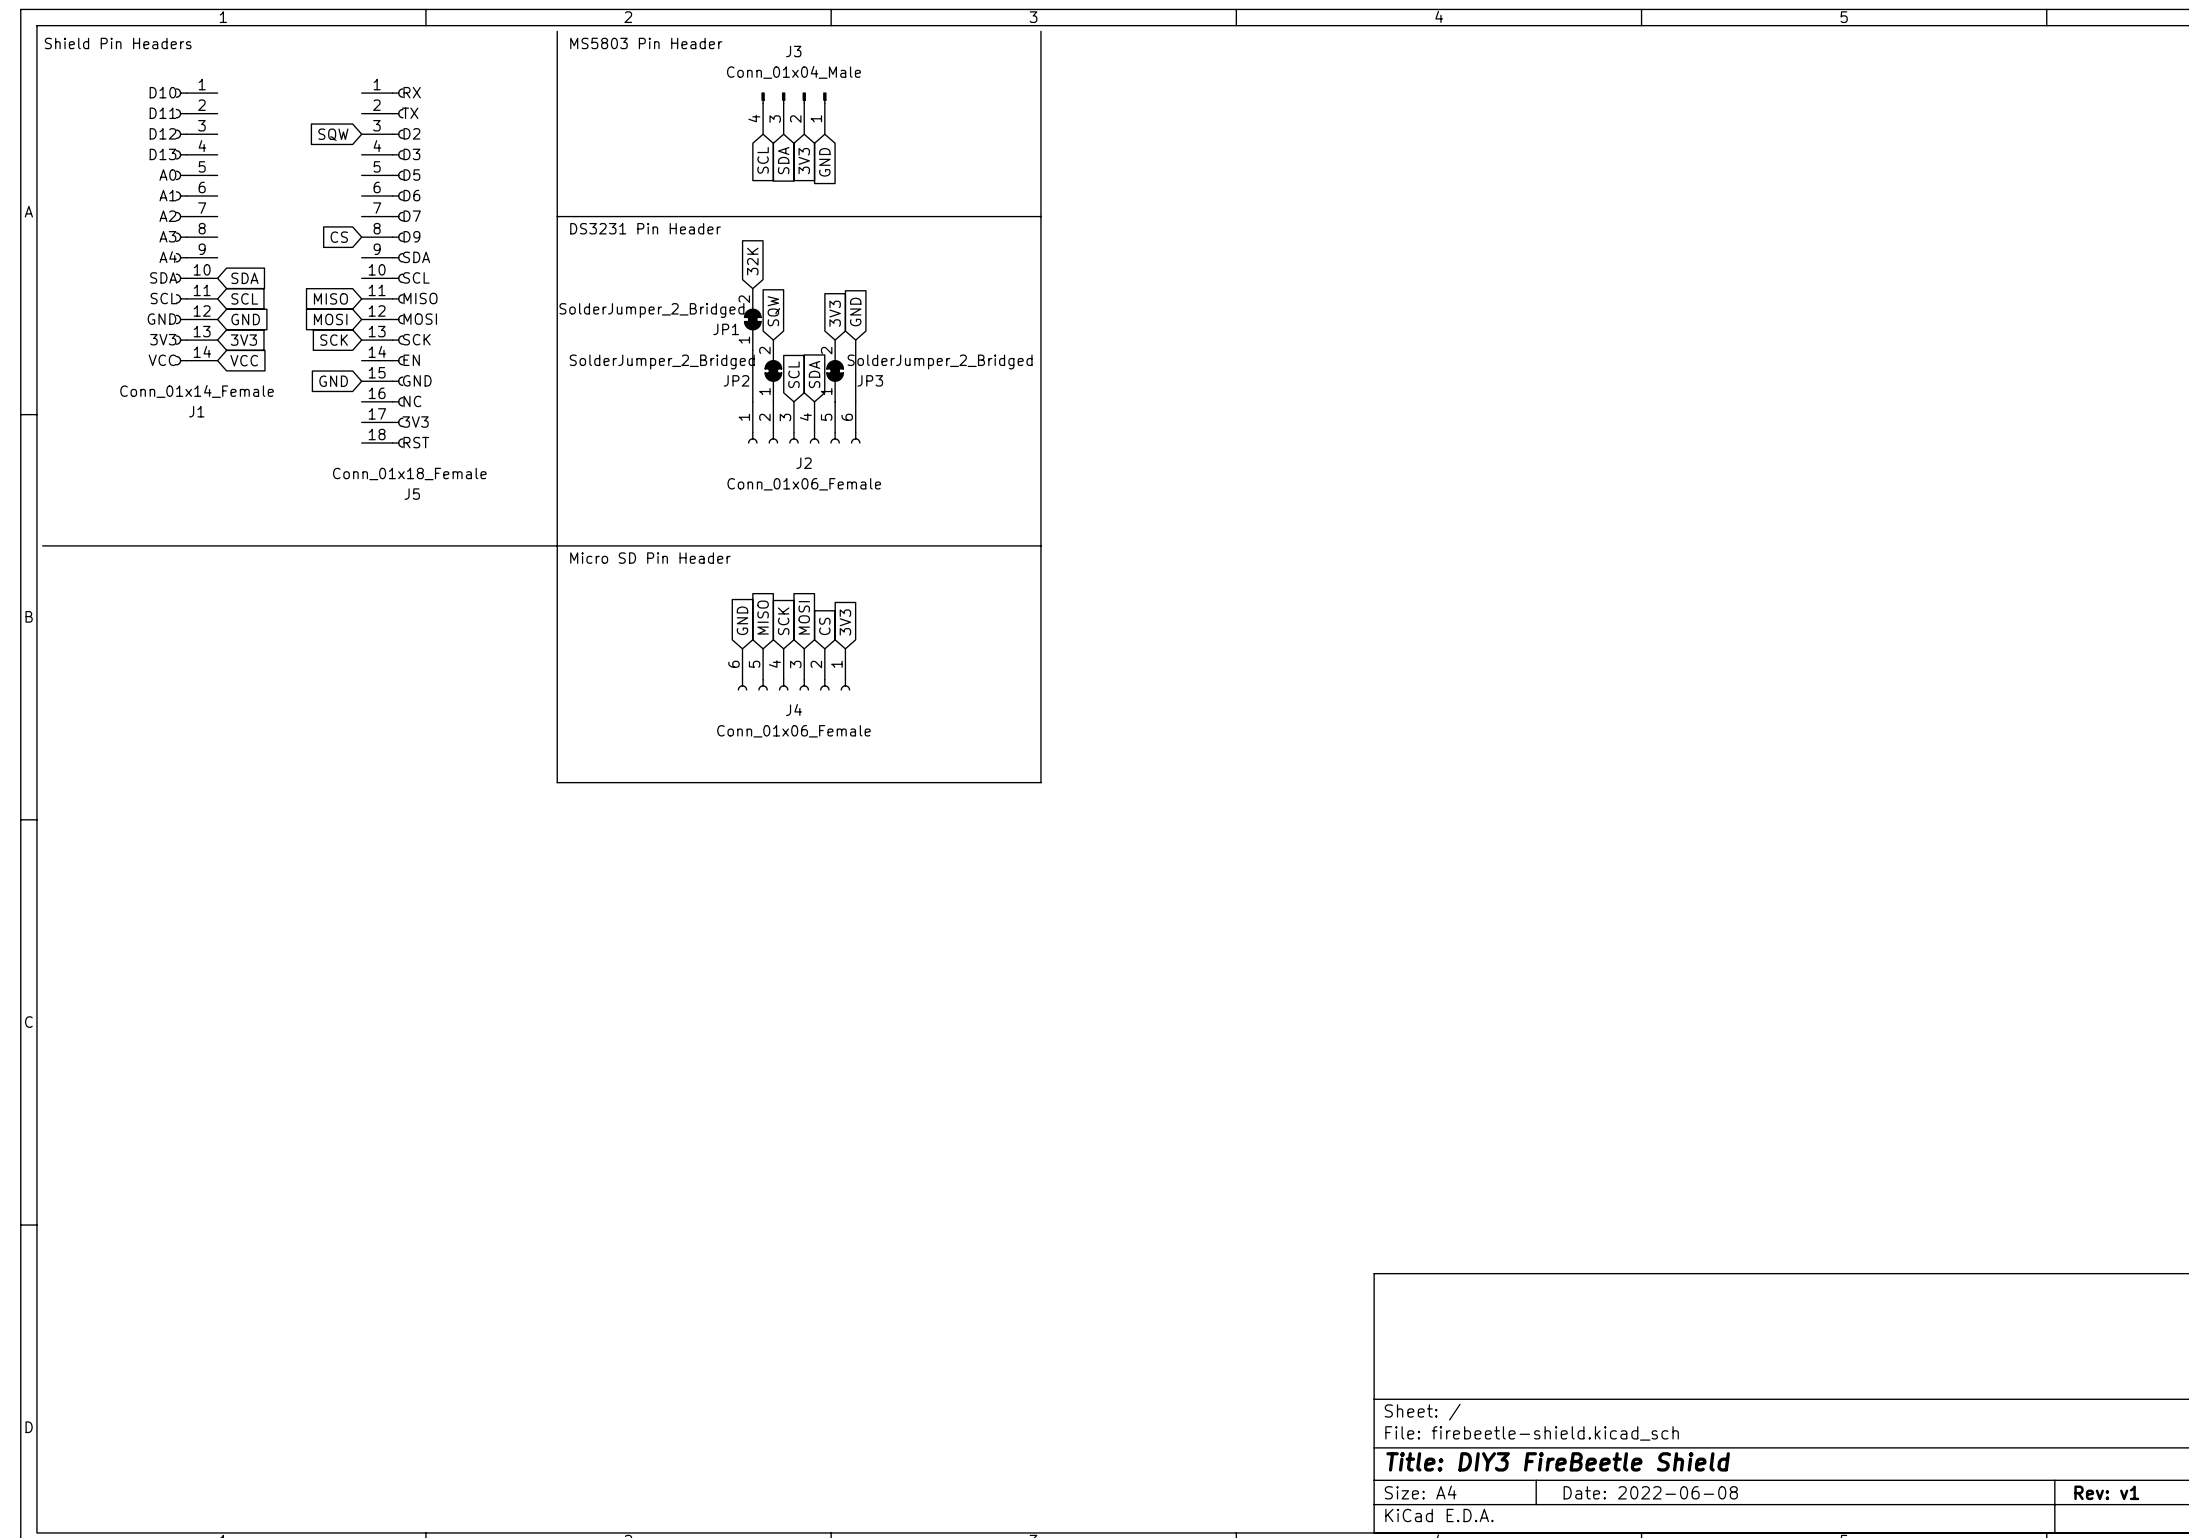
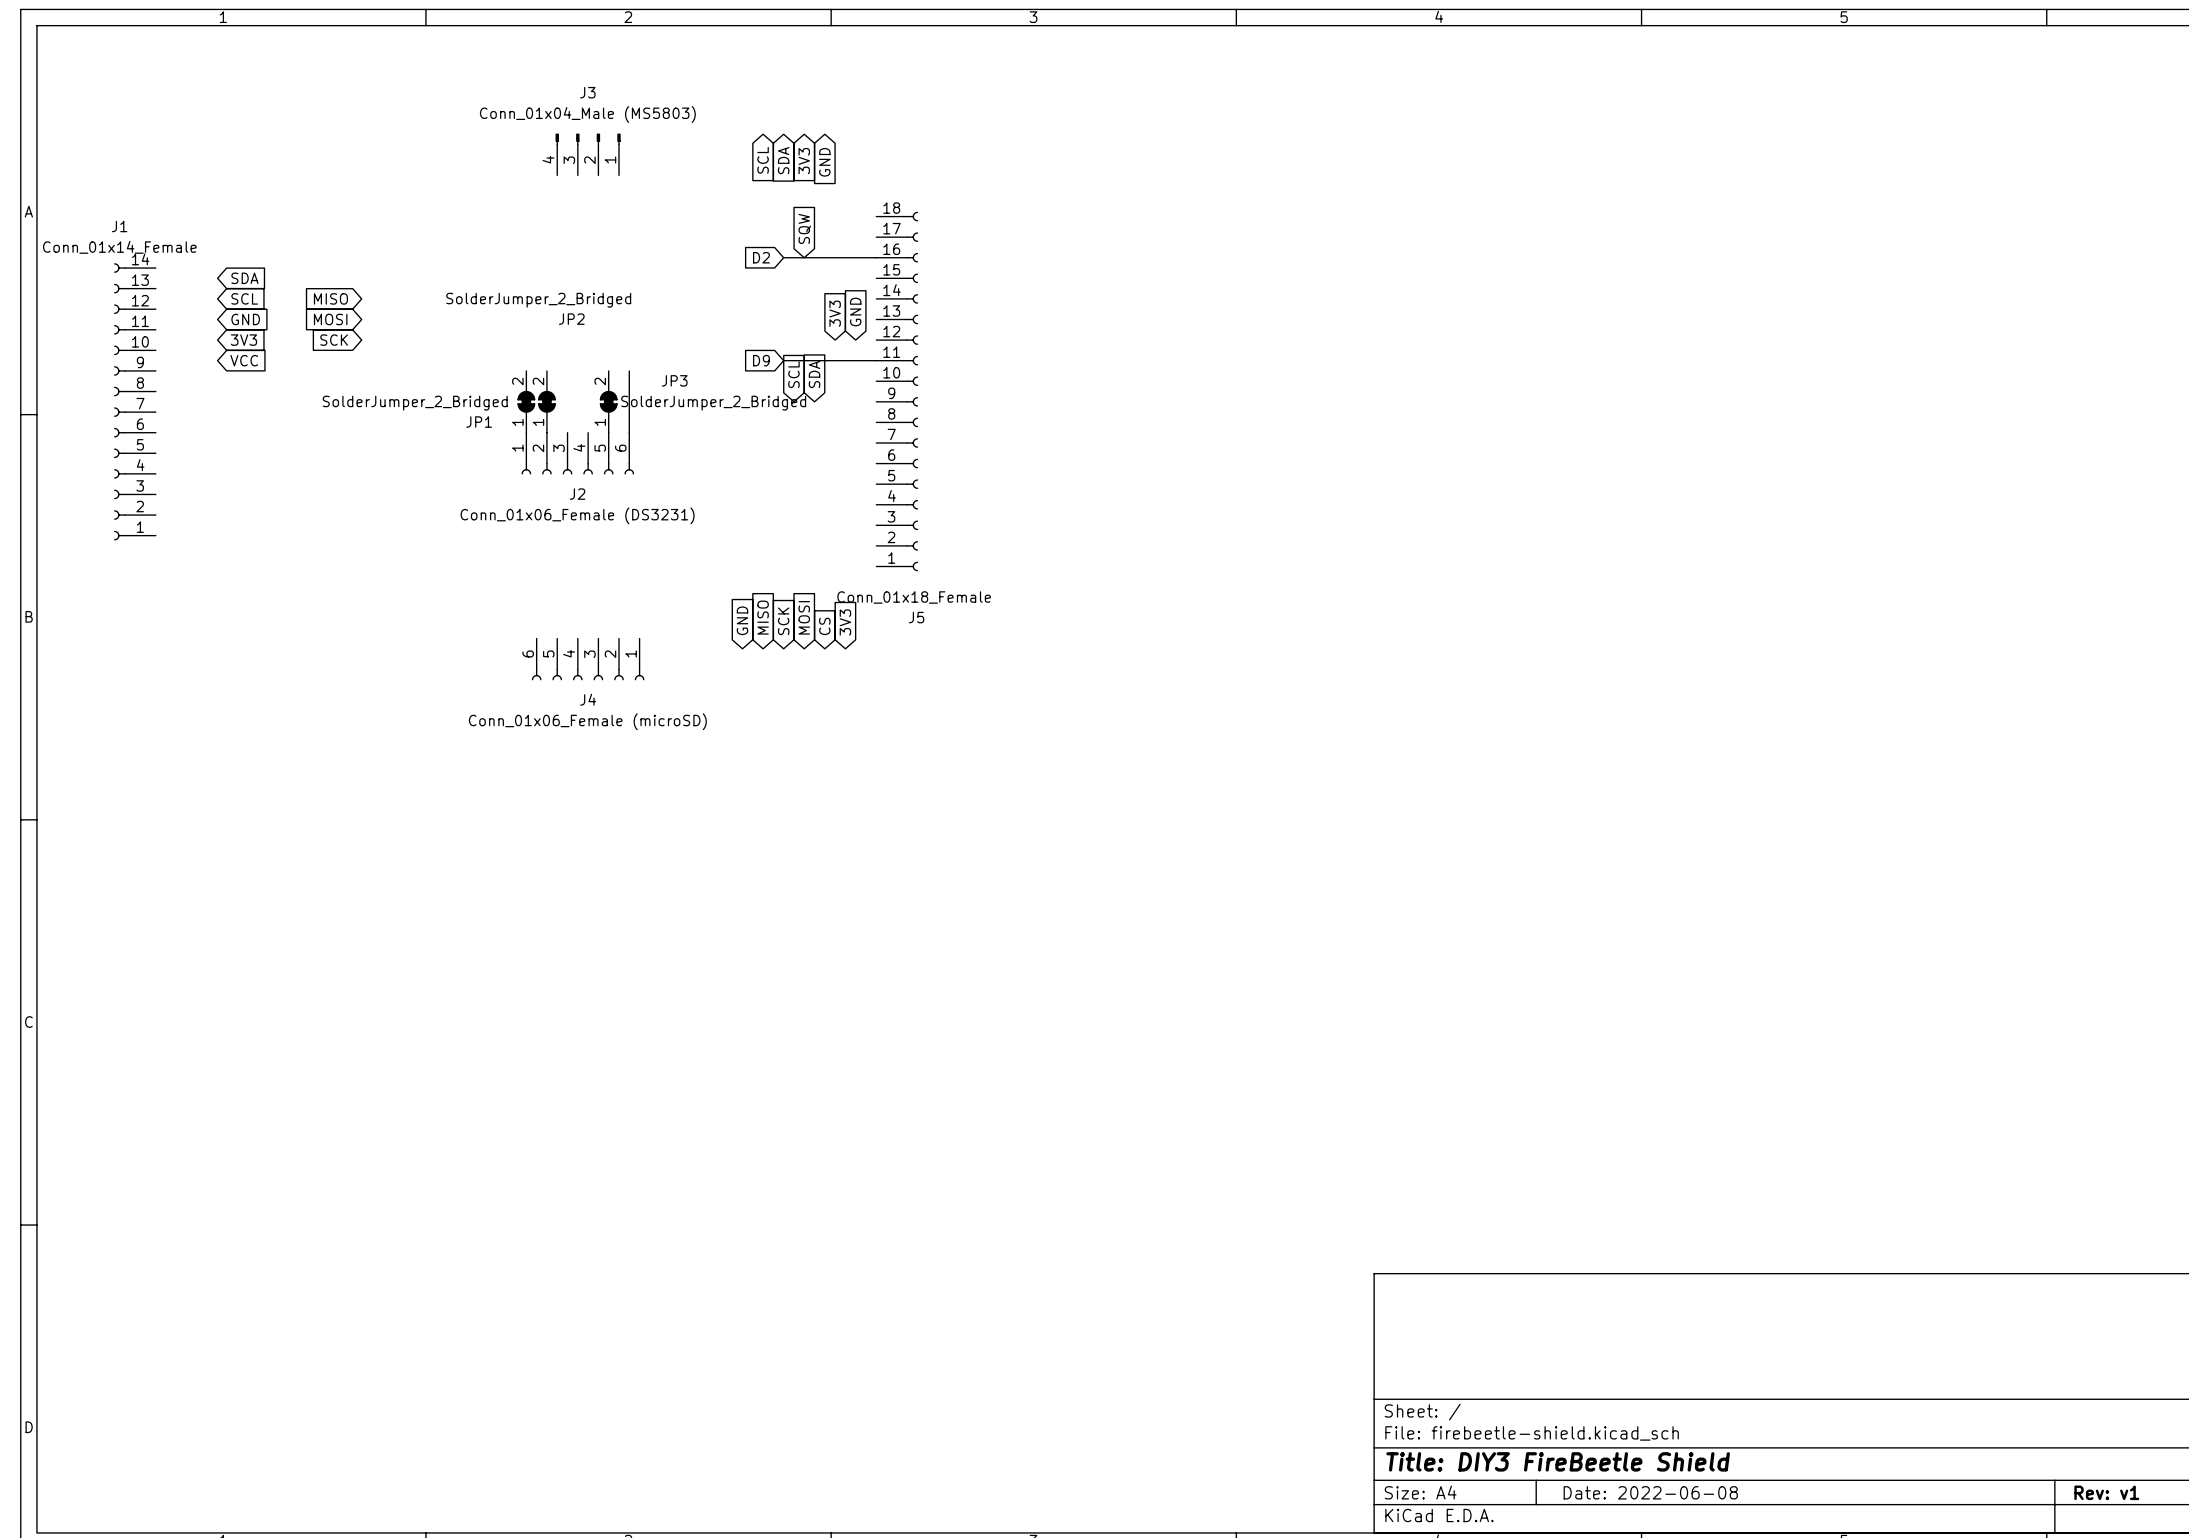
line: (557, 31) (557, 782) (1040, 782) (1040, 31) -> none
text: Shield Pin Headers (118, 43) -> none
text: MS5803 Pin Header (646, 43) -> none
J3 value: Conn_01x04_Male (793, 72) -> Conn_01x04_Male (MS5803) (587, 114)
J1 symbol: [175, 88, 218, 366] -> [114, 263, 156, 541]
J5 symbol: [361, 88, 404, 448] -> [876, 211, 919, 572]
J3 position: (793, 113) -> (588, 154)
global label: SQW (333, 134) -> none
line: (557, 216) (1040, 216) -> none
text: DS3231 Pin Header (645, 228) -> none
global label: CS (339, 237) -> none
global label: none -> D2 (761, 257)
wire: none -> (783, 257) (876, 257)
global label: 32K (752, 261) -> none
JP1 value position: SolderJumper_2_Bridged (651, 310) -> SolderJumper_2_Bridged (415, 403)
global label position: SQW (773, 311) -> SQW (804, 228)
JP1 position: (752, 319) -> (526, 401)
JP1 name position: JP1 (726, 329) -> JP1 (479, 422)
wire: (855, 340) (855, 401) -> none
wire: (752, 350) (752, 401) -> none
global label: none -> D9 (761, 360)
wire: none -> (783, 360) (876, 360)
JP2 value position: SolderJumper_2_Bridged (662, 361) -> SolderJumper_2_Bridged (538, 300)
JP3 value position: SolderJumper_2_Bridged (940, 361) -> SolderJumper_2_Bridged (713, 403)
wire: none -> (629, 370) (629, 432)
JP2 position: (773, 370) -> (546, 401)
JP3 position: (835, 370) -> (608, 401)
JP2 name position: JP2 (736, 380) -> JP2 (571, 319)
JP3 name position: JP3 (870, 380) -> JP3 (674, 380)
global label: GND (333, 381) -> none
J1 value position: Conn_01x14_Female (197, 391) -> Conn_01x14_Female (119, 247)
J1 name position: J1 (196, 411) -> J1 (119, 226)
J2 position: (804, 422) -> (577, 453)
J2 value: Conn_01x06_Female (804, 484) -> Conn_01x06_Female (DS3231) (577, 515)
line: (42, 545) (1040, 545) -> none
text: Micro SD Pin Header (650, 558) -> none
J4 position: (793, 669) -> (588, 659)
J4 value: Conn_01x06_Female (793, 731) -> Conn_01x06_Female (microSD) (587, 721)

